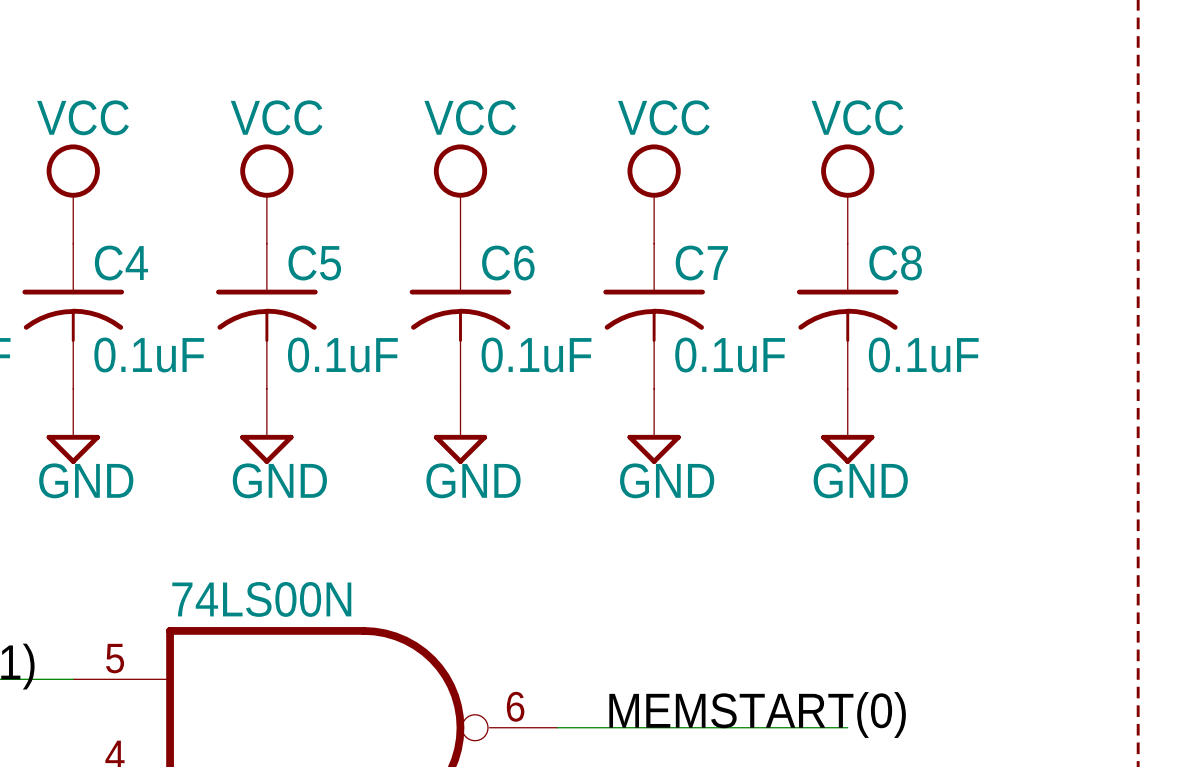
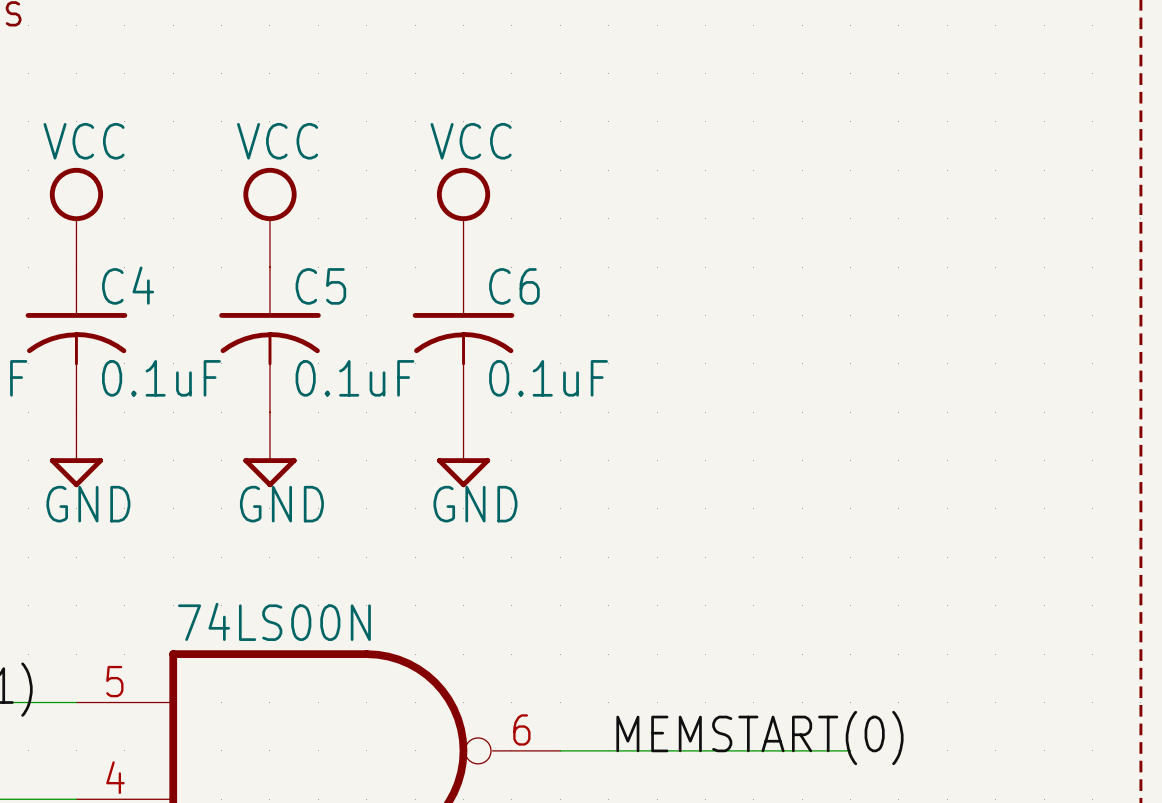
power symbol: VCC (654, 194) -> none
power symbol: VCC (847, 194) -> none
C7: 0.1uF (654, 316) -> none
C8: 0.1uF (847, 316) -> none
power symbol: GND (654, 426) -> none
power symbol: GND (847, 426) -> none

